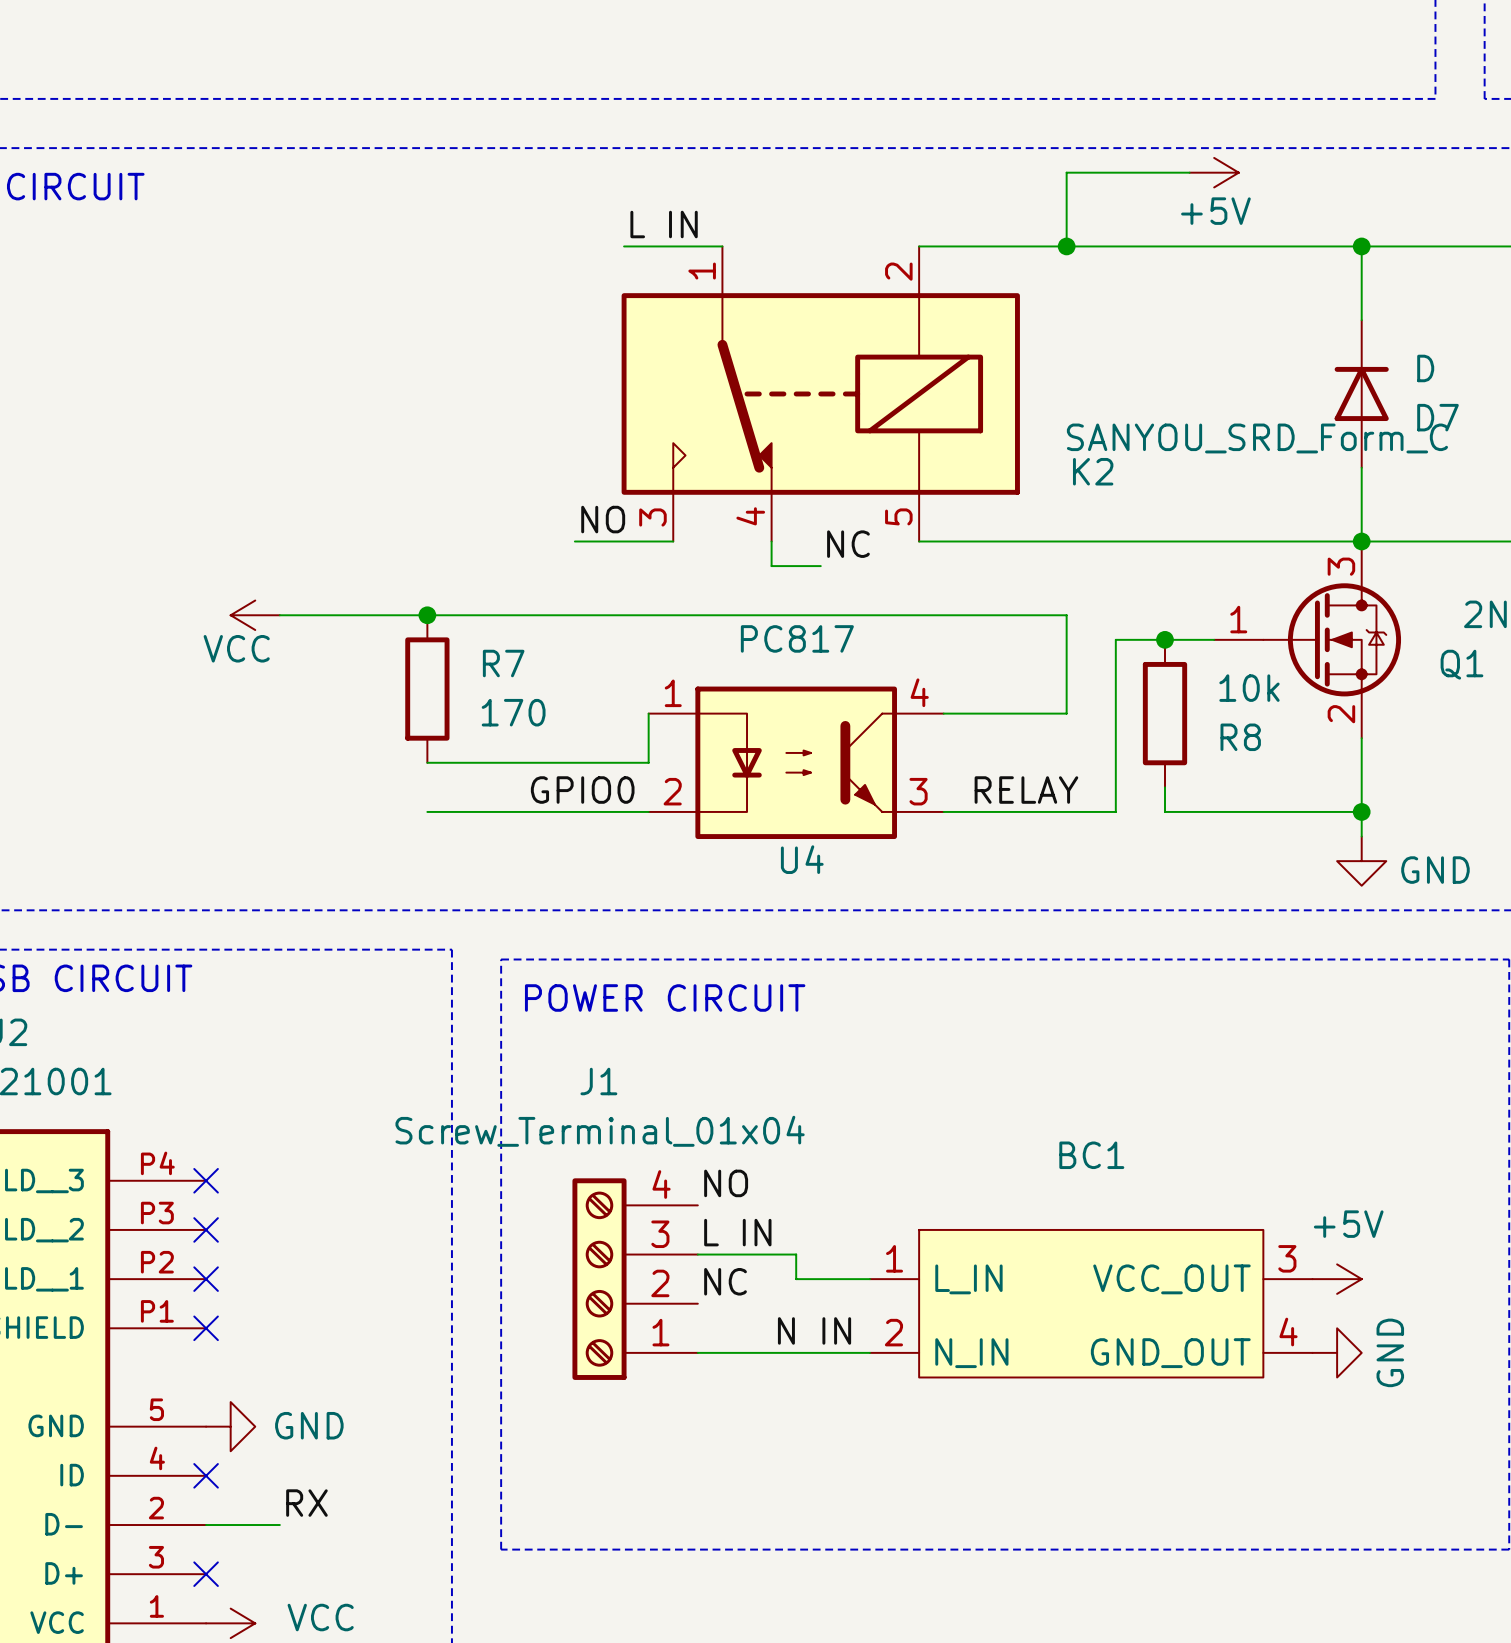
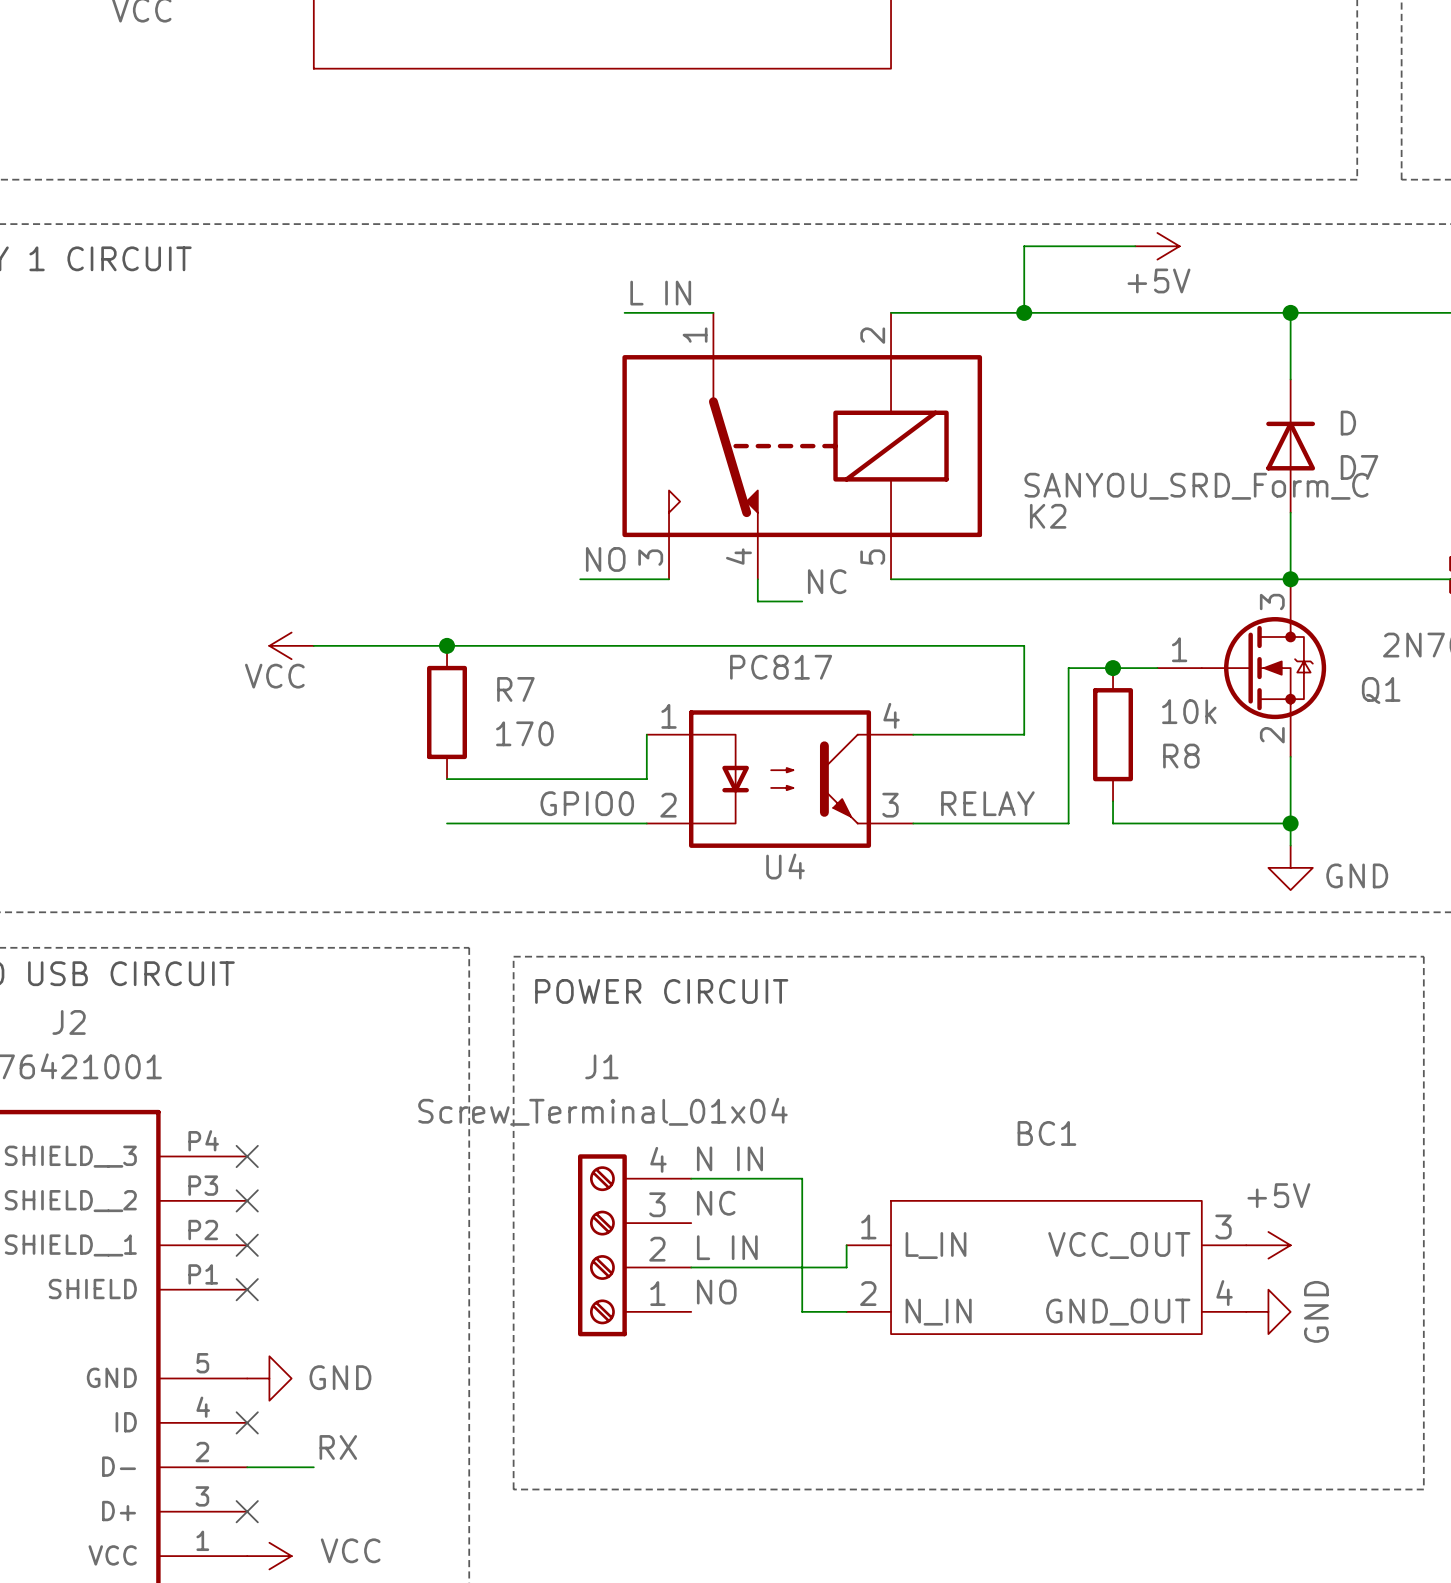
label: NO (726, 1183) -> N IN (729, 1158)
label: L IN (737, 1232) -> NC (716, 1203)
wire: (697, 1254) (796, 1254) (796, 1279) (869, 1279) -> (691, 1267) (846, 1267) (846, 1245)
label: NC (725, 1281) -> L IN (727, 1247)
label: none -> NO (716, 1292)
label: N IN (814, 1330) -> none
wire: (697, 1352) (820, 1352) -> (691, 1178) (802, 1178) (802, 1311)

